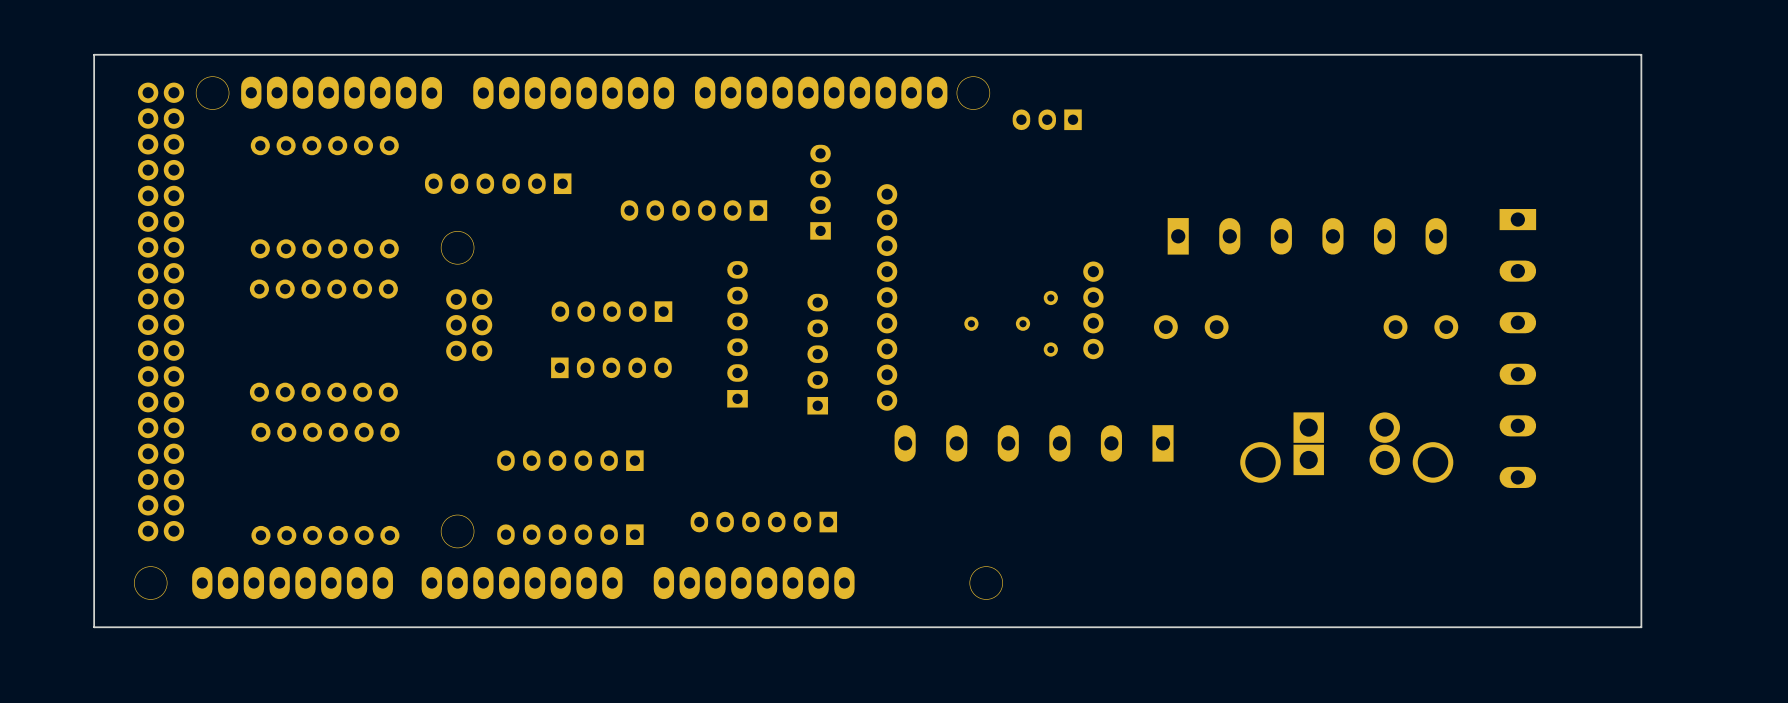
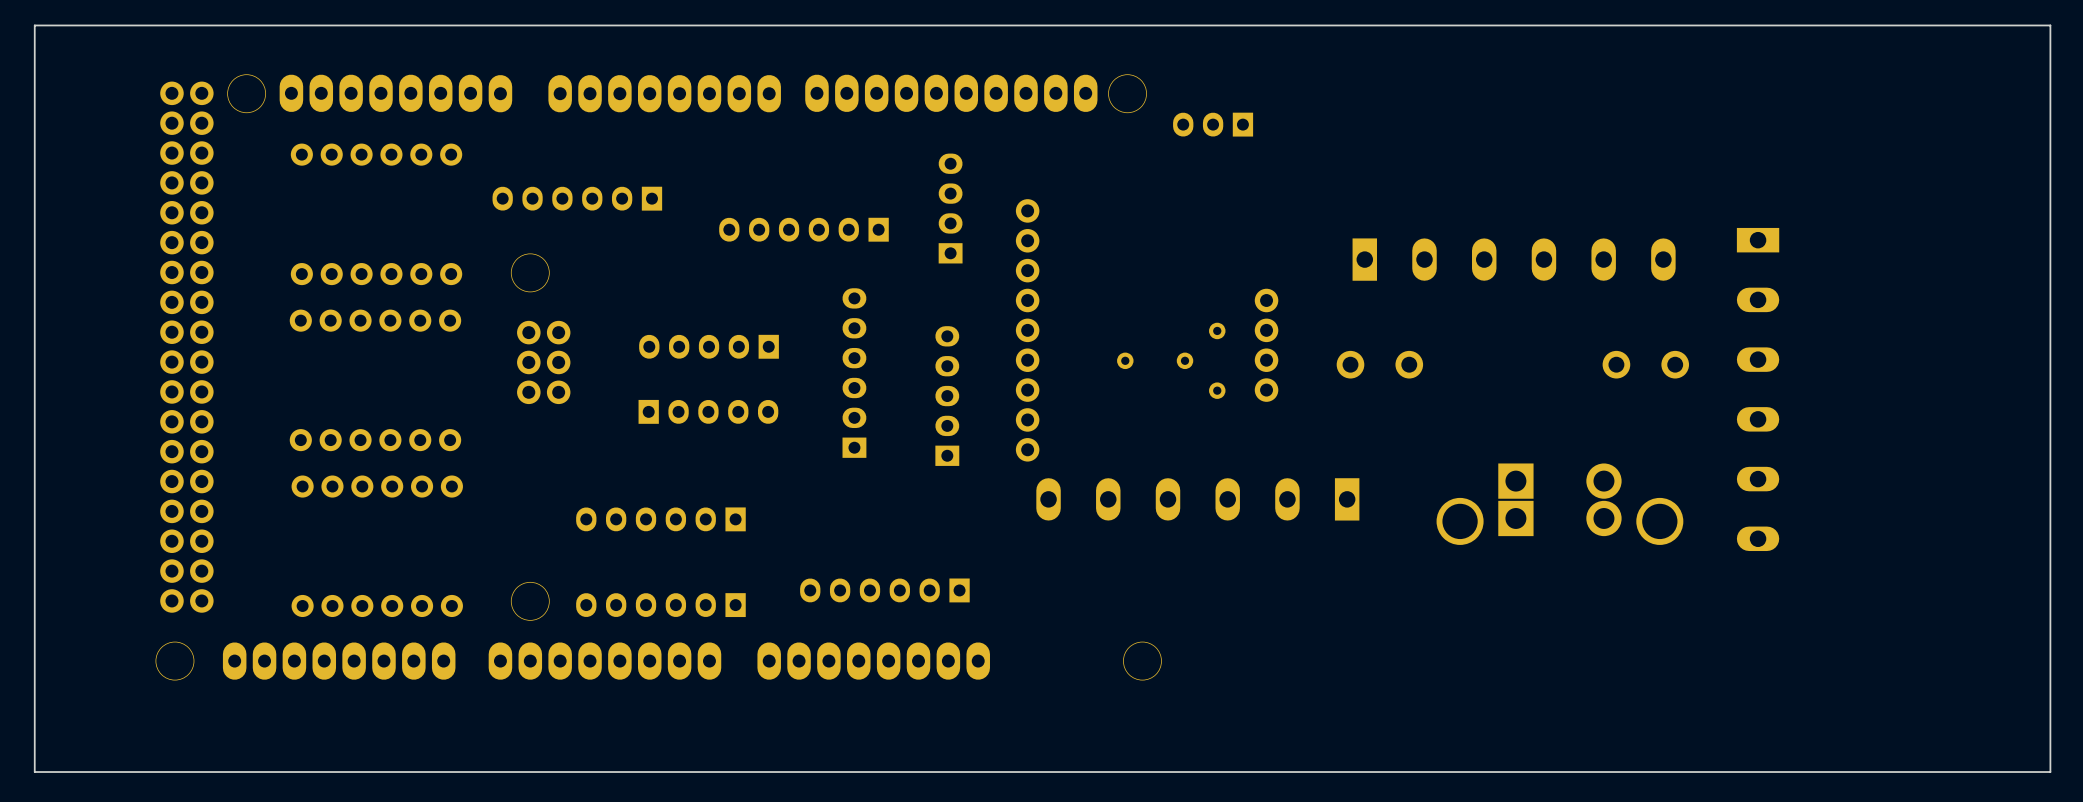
board edge: (1641, 54) (94, 54) (94, 627) (1641, 627) (1641, 54) -> (2050, 25) (2050, 772) (34, 772) (34, 25) (2050, 25)

